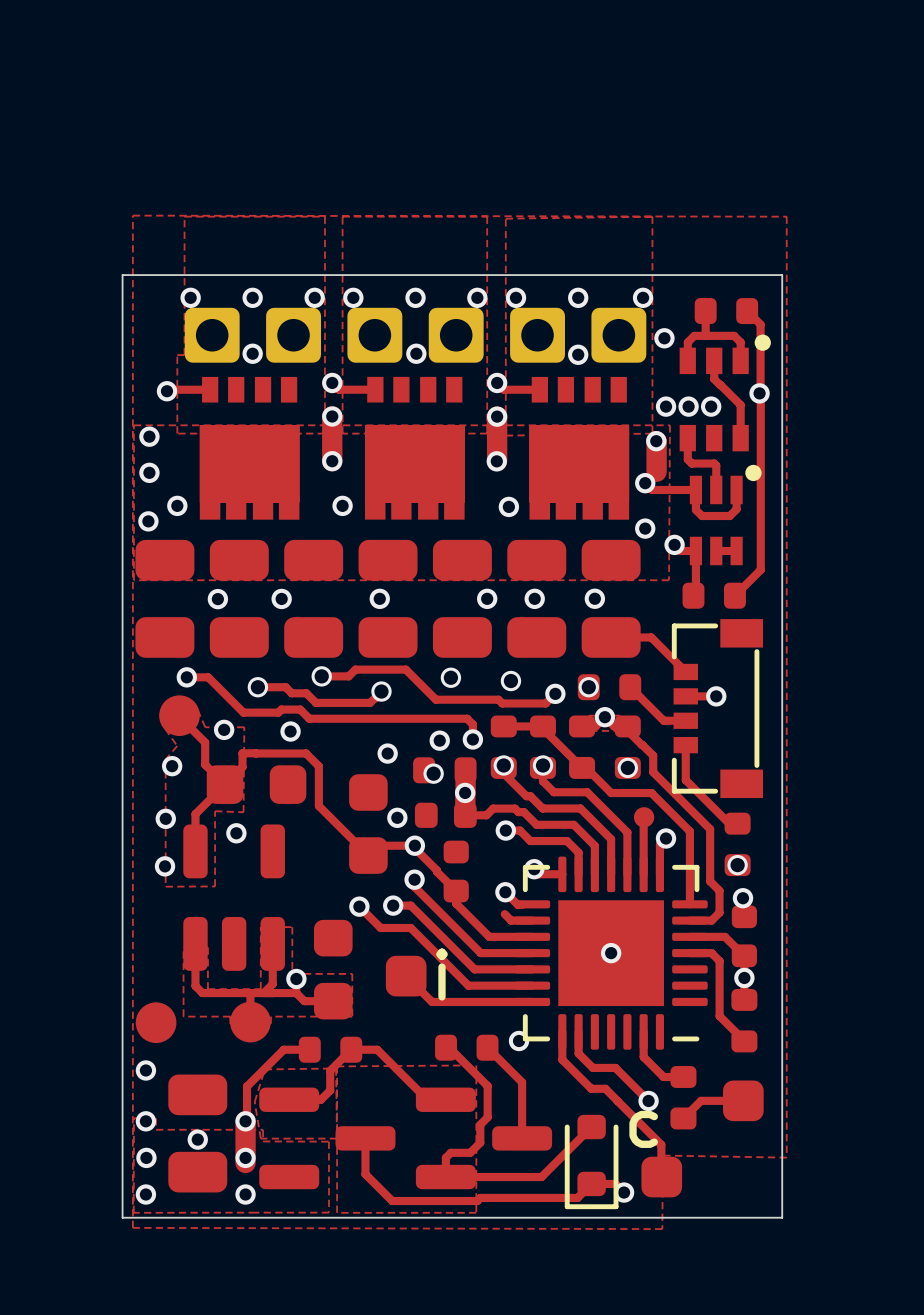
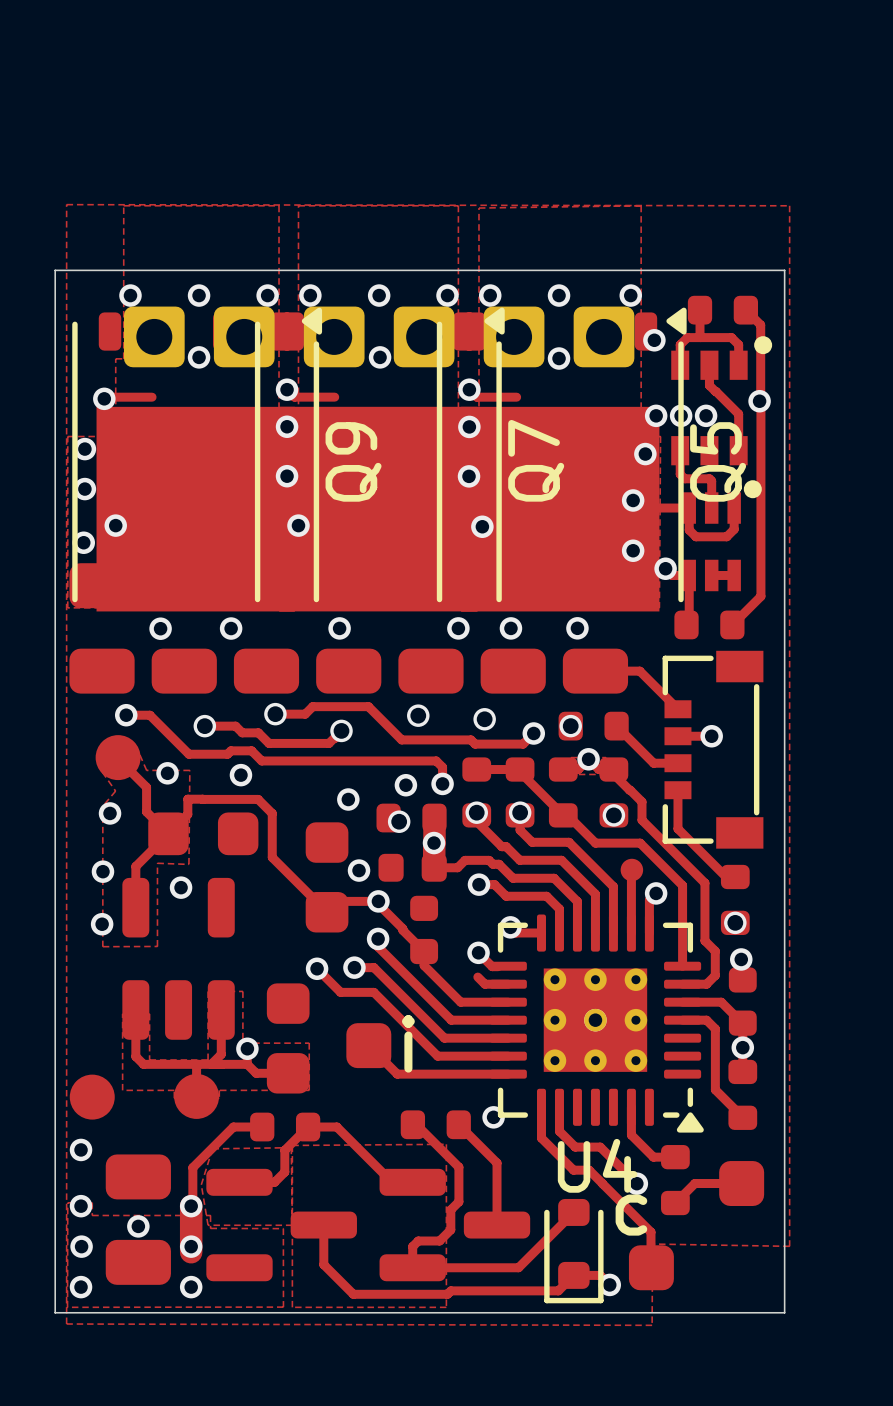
Q9: none -> (197, 459)
Q7: none -> (379, 459)
Q5: none -> (561, 459)
part: (249, 448) -> none
part: (414, 448) -> none
part: (579, 448) -> none
part: (611, 953) -> none
U4: none -> (596, 1023)

